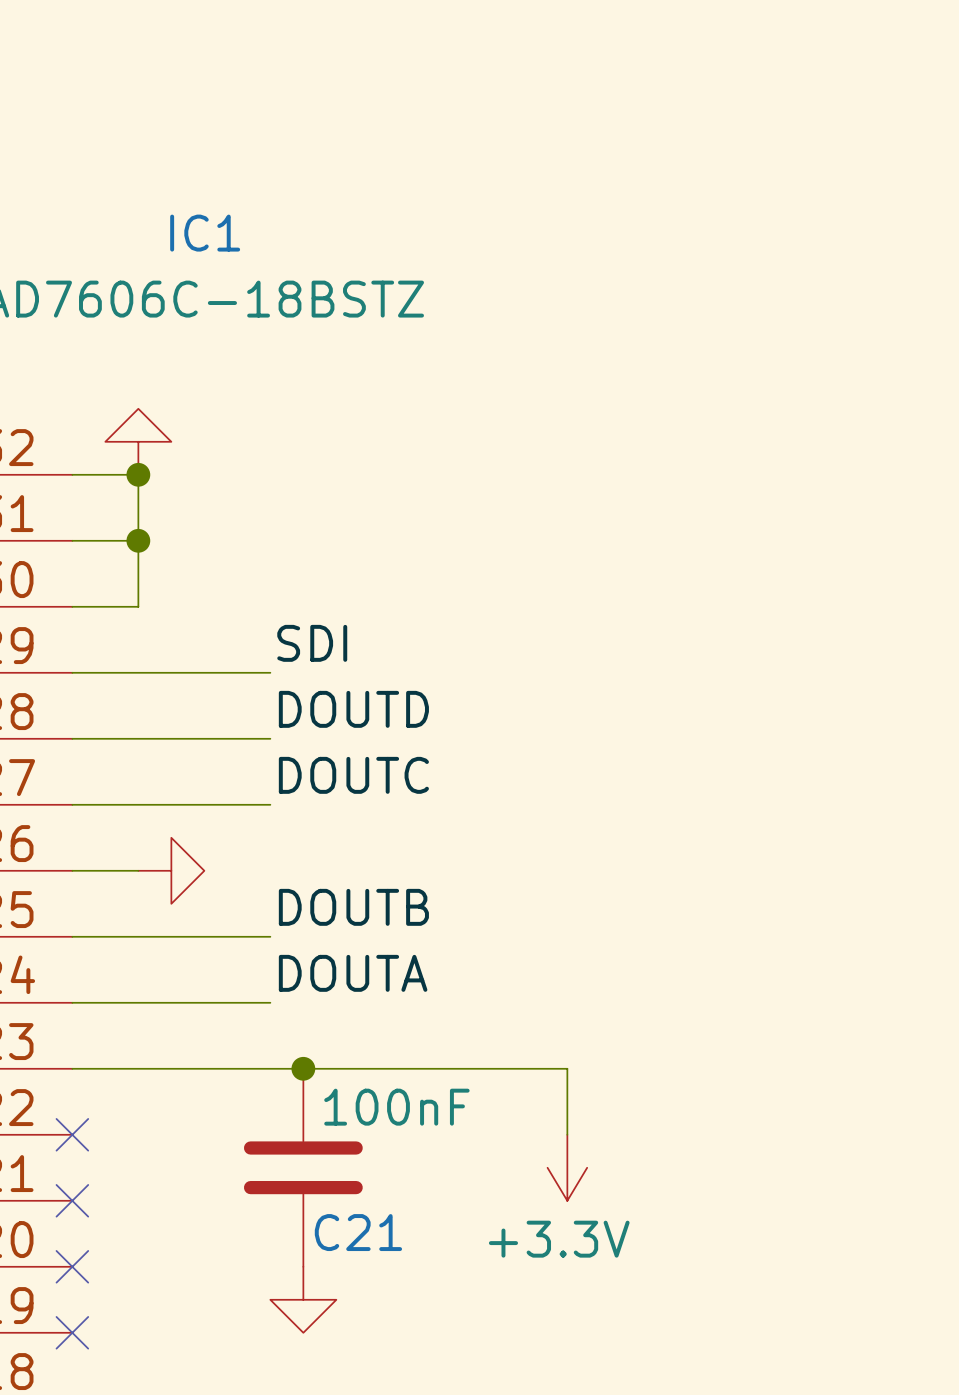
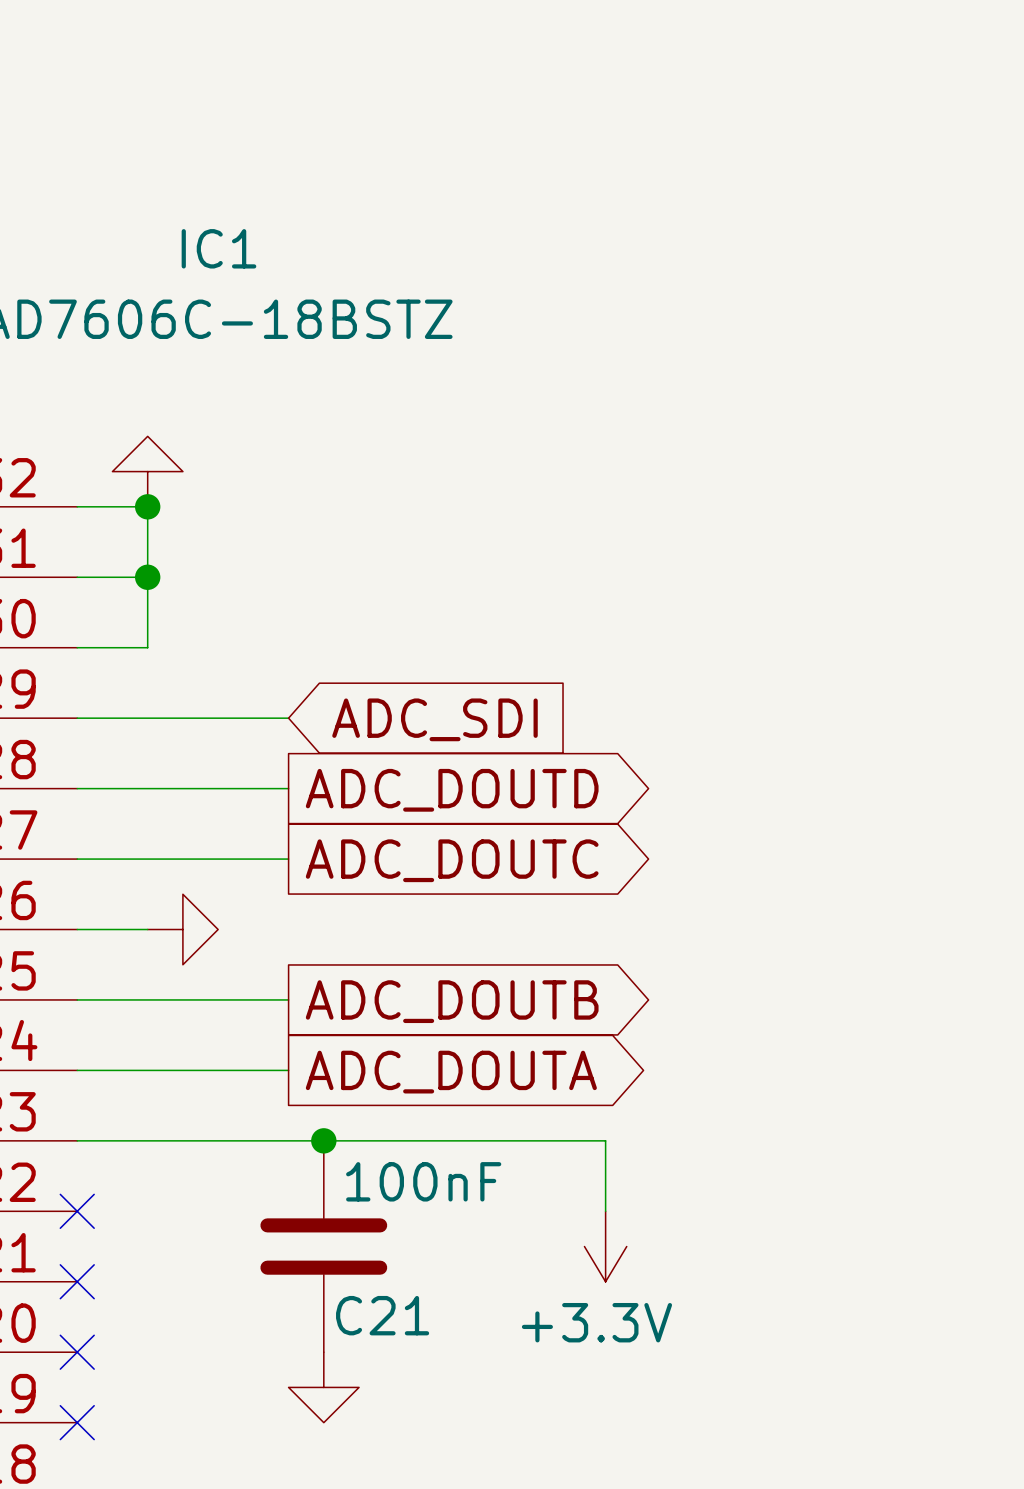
label: SDI (312, 643) -> none
global label: none -> ADC_SDI (434, 719)
label: DOUTD (353, 709) -> none
global label: none -> ADC_DOUTD (452, 790)
label: DOUTC (353, 775) -> none
global label: none -> ADC_DOUTC (452, 860)
label: DOUTB (353, 907) -> none
global label: none -> ADC_DOUTB (452, 1001)
label: DOUTA (353, 973) -> none
global label: none -> ADC_DOUTA (451, 1072)

